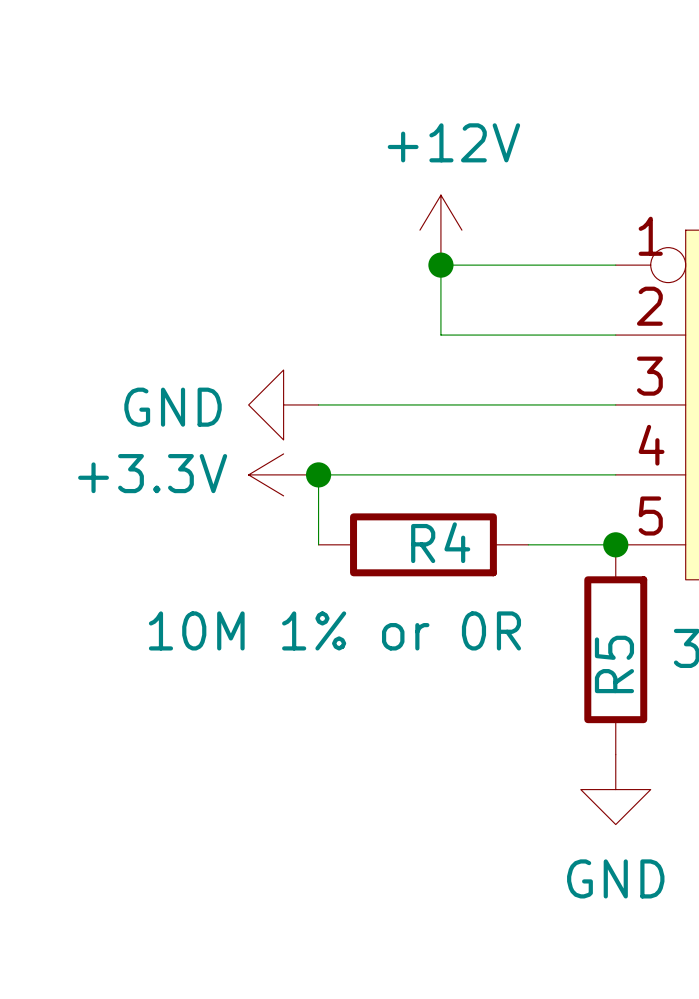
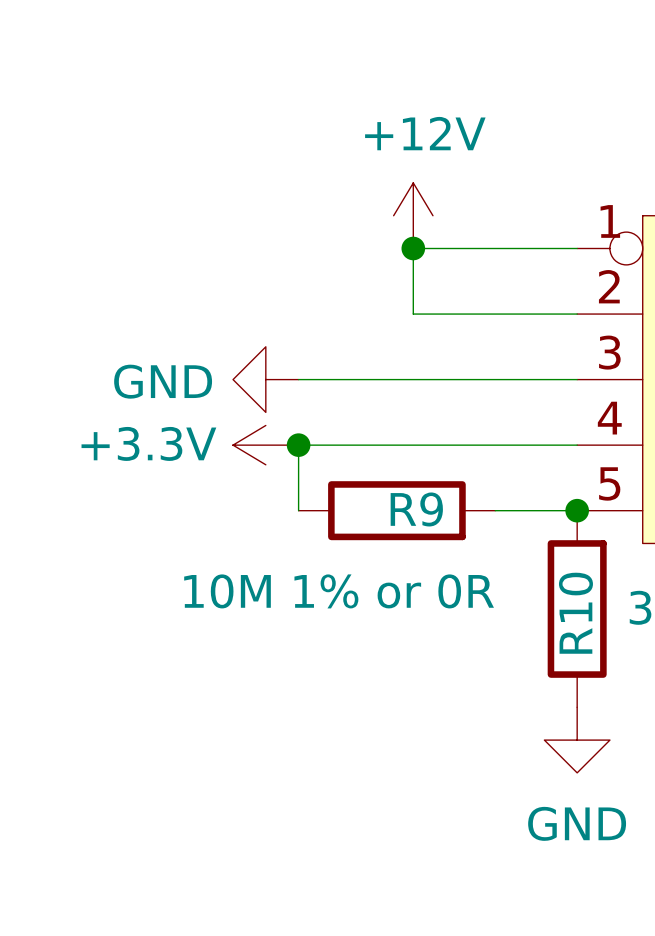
R4 name: R4 (440, 542) -> R9 (416, 509)
R5 name: R5 (614, 664) -> R10 (575, 613)

